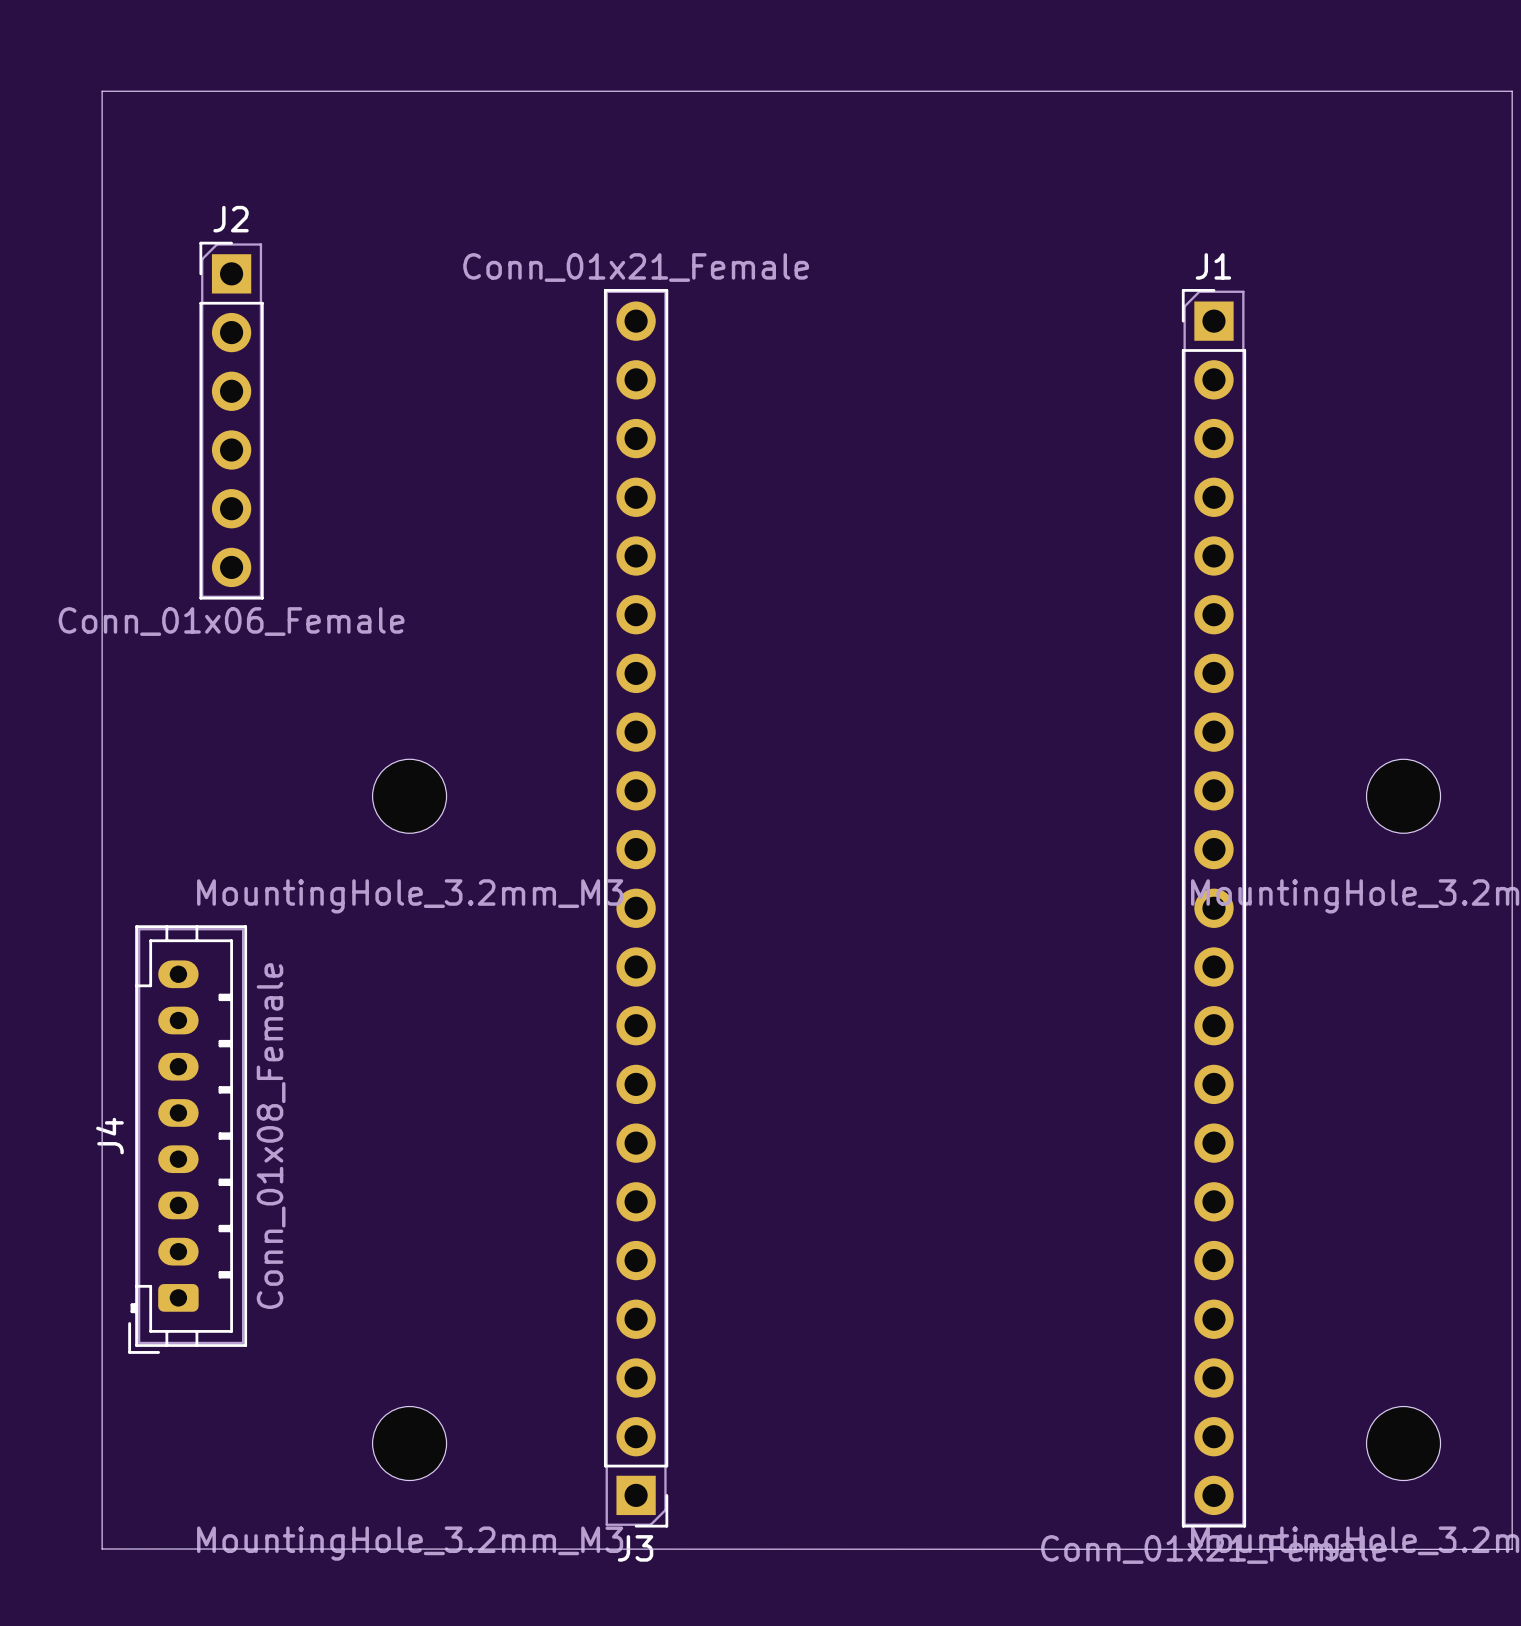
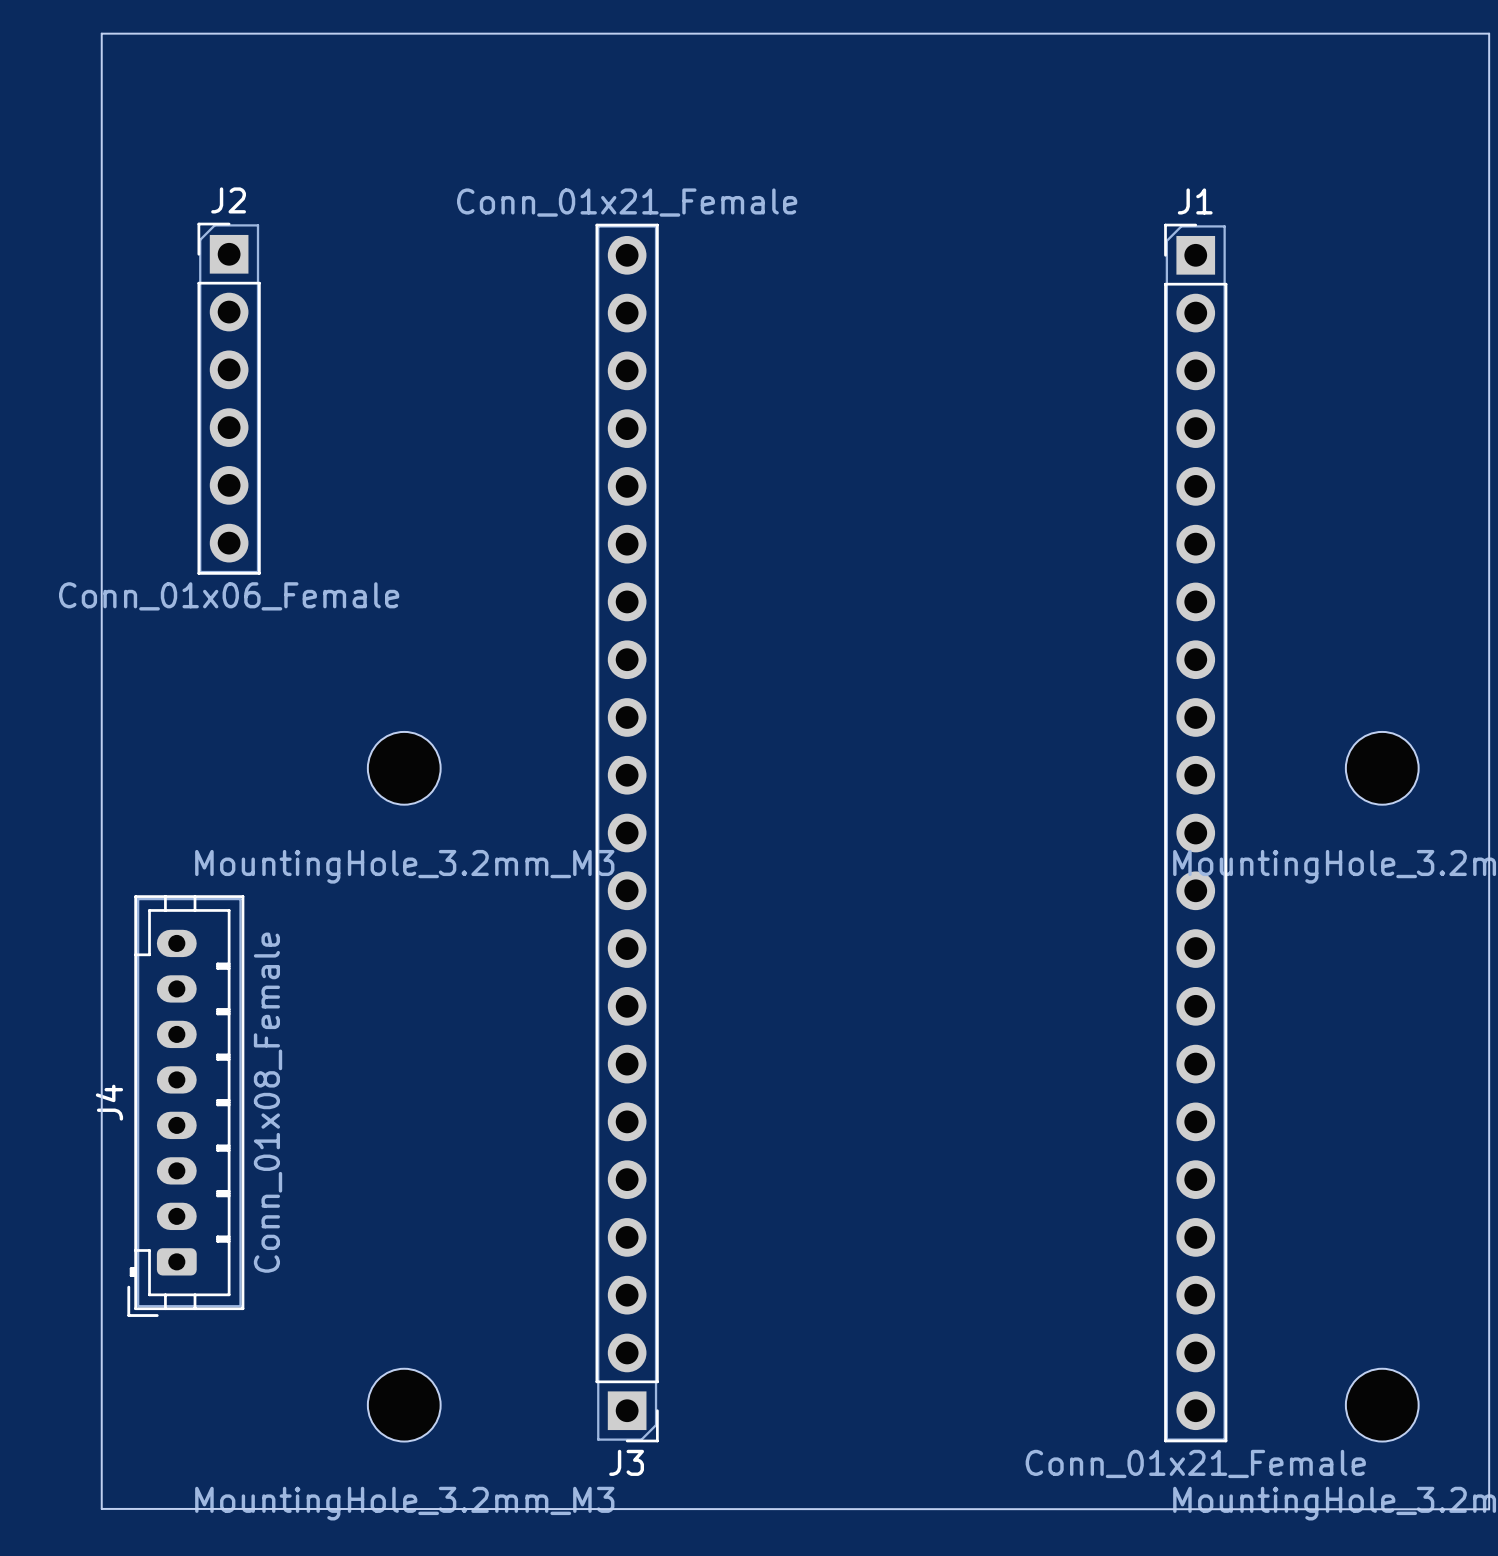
board edge: (102, 91) (1512, 91) -> (101, 74) (101, 33) (1489, 33) (1489, 74)
J3 position: (636, 908) -> (627, 833)
J1 position: (1213, 908) -> (1195, 833)

